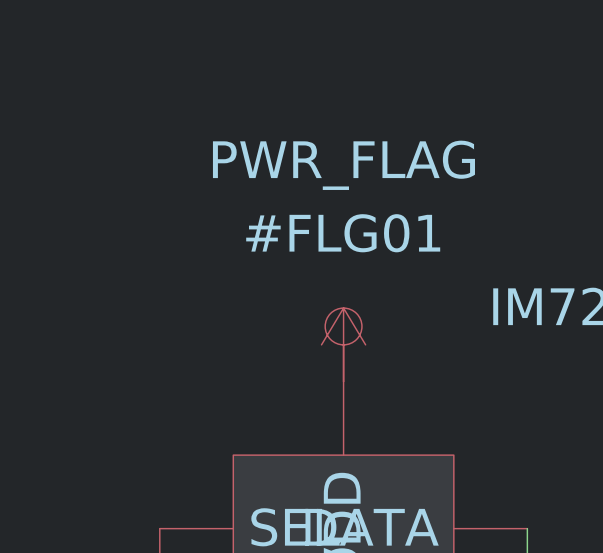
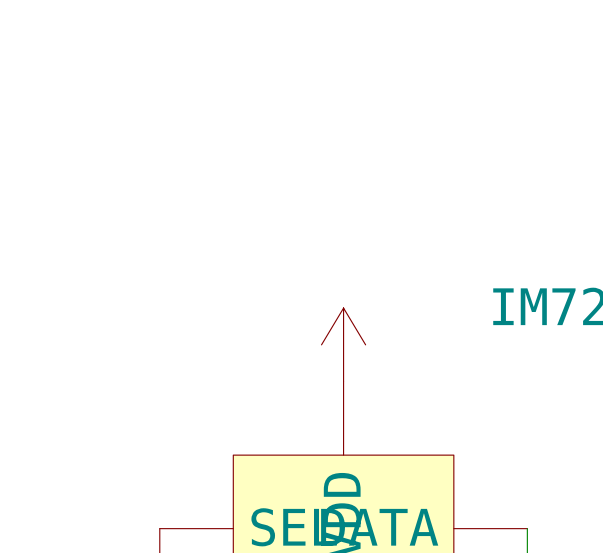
#FLG01: PWR_FLAG (343, 344) -> none

